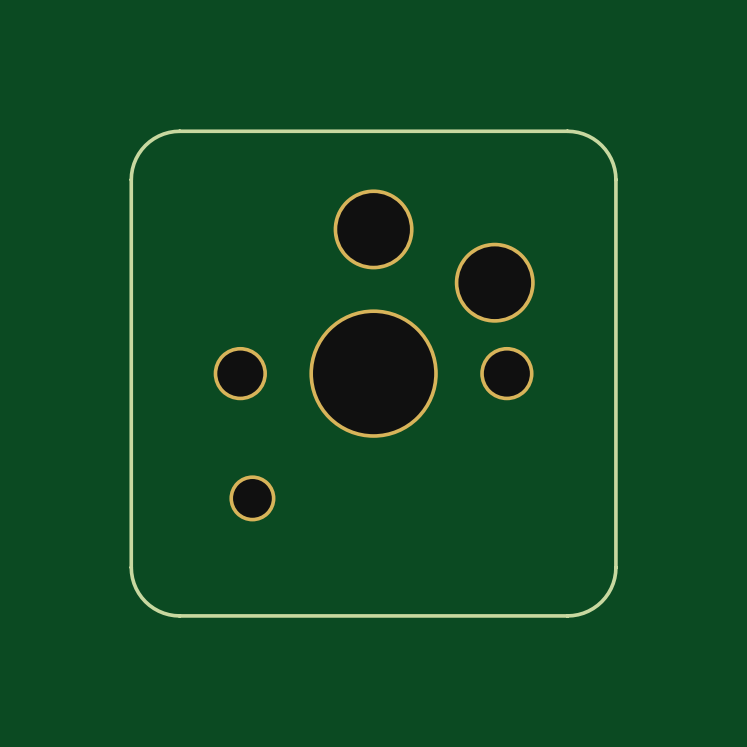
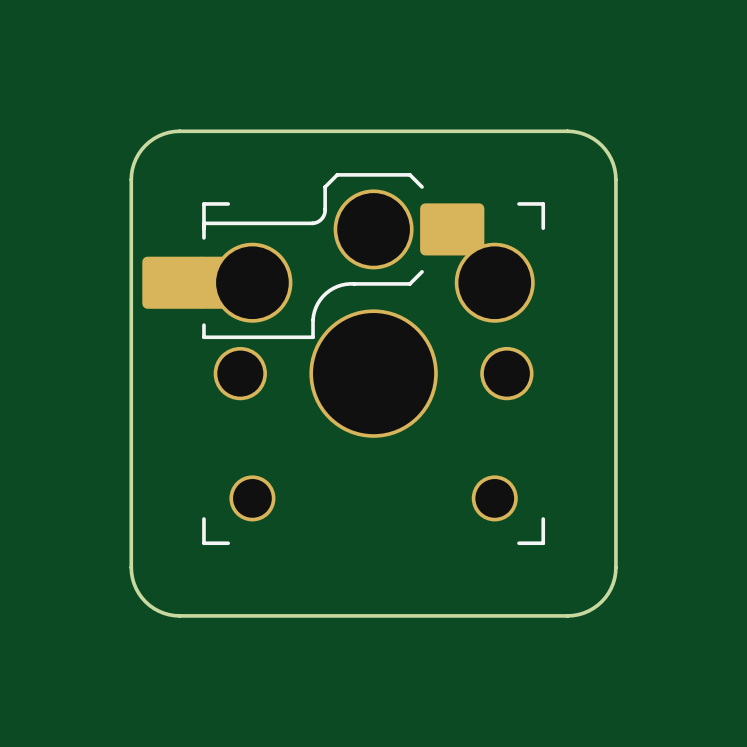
part: (374, 355) -> none
part: none -> (343, 359)

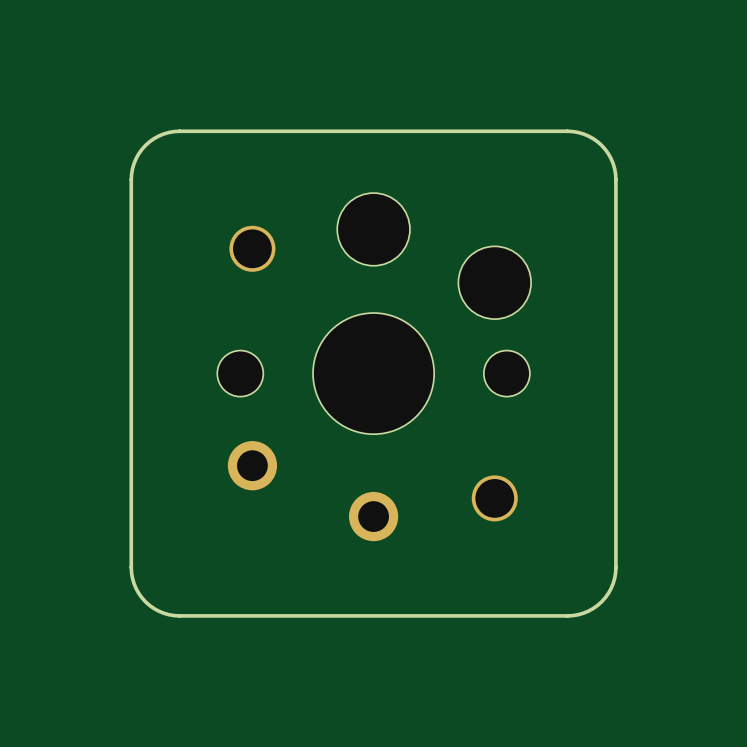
part: (343, 359) -> none
part: none -> (374, 367)

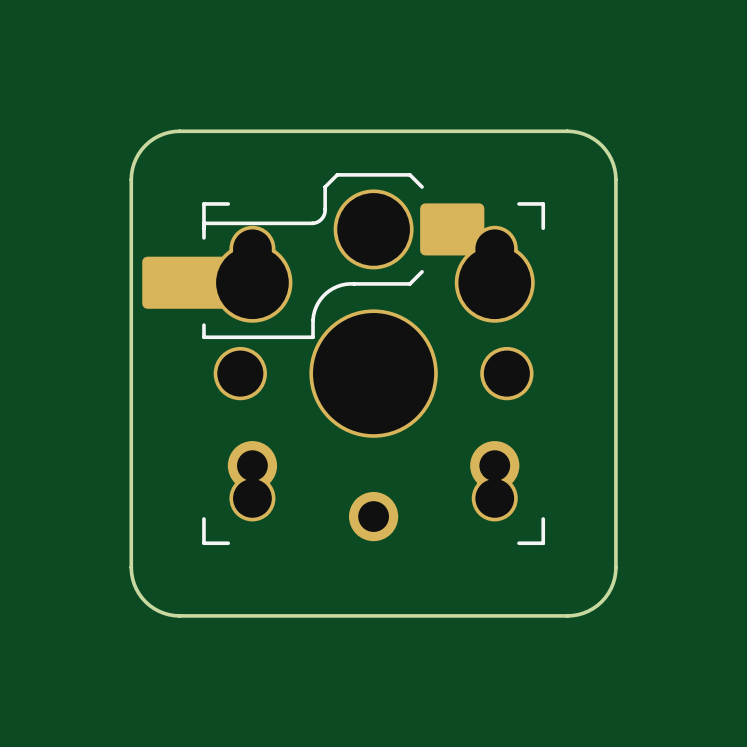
part: none -> (343, 359)
part: (374, 367) -> none

